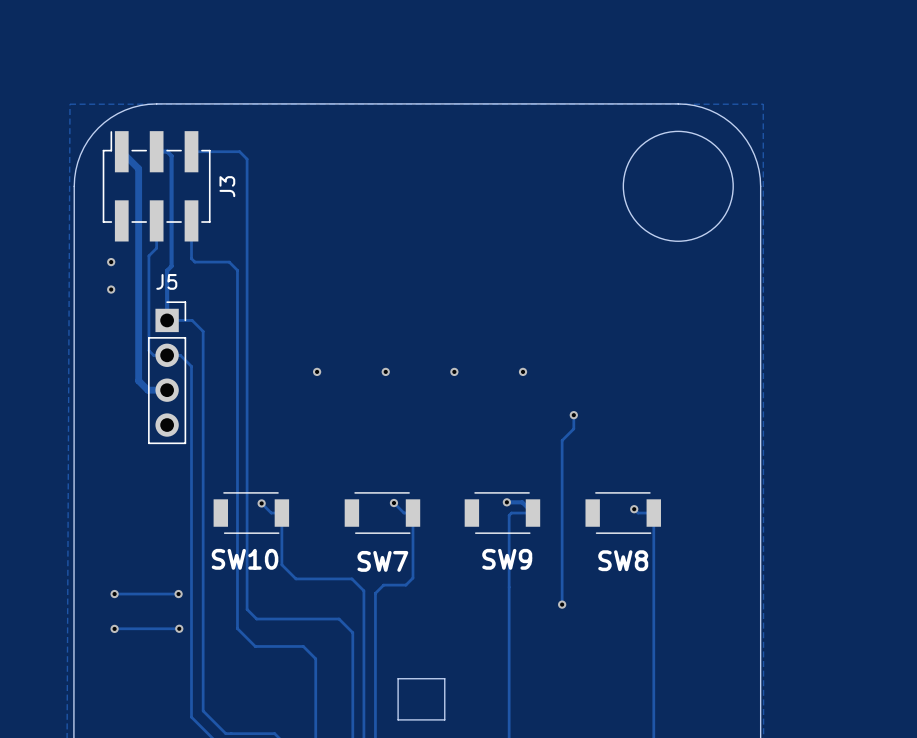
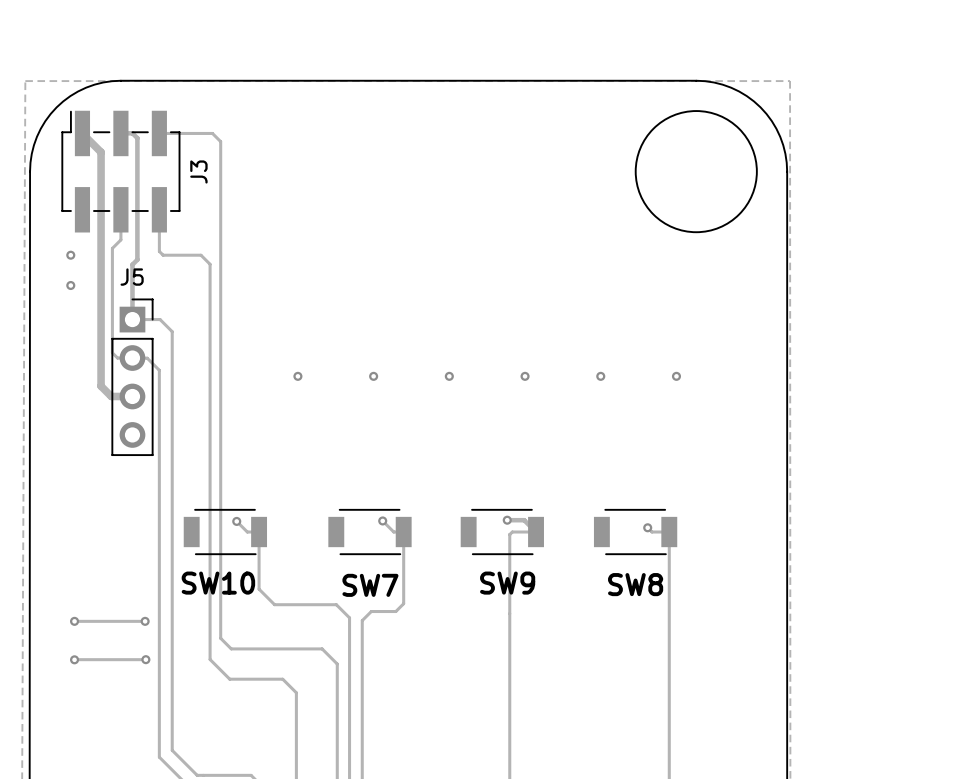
via: none -> (676, 376)
track: (573, 415) (573, 428) (562, 440) (562, 604) -> none
via position: (573, 415) -> (600, 376)
via: (562, 604) -> none
part: (421, 699) -> none

